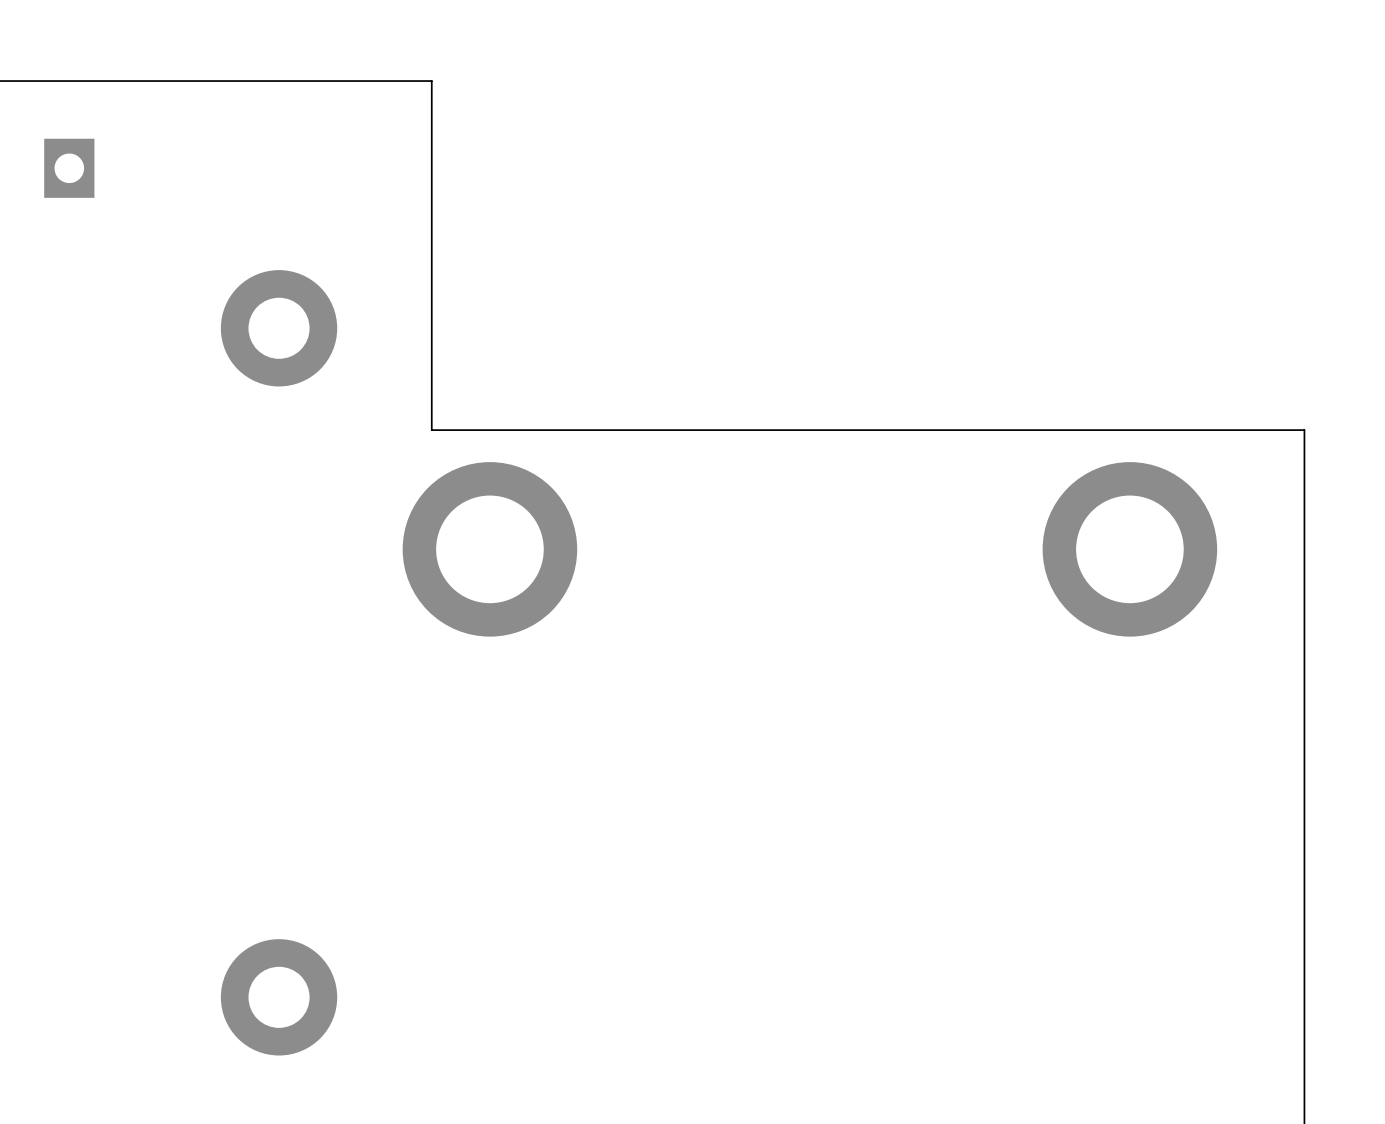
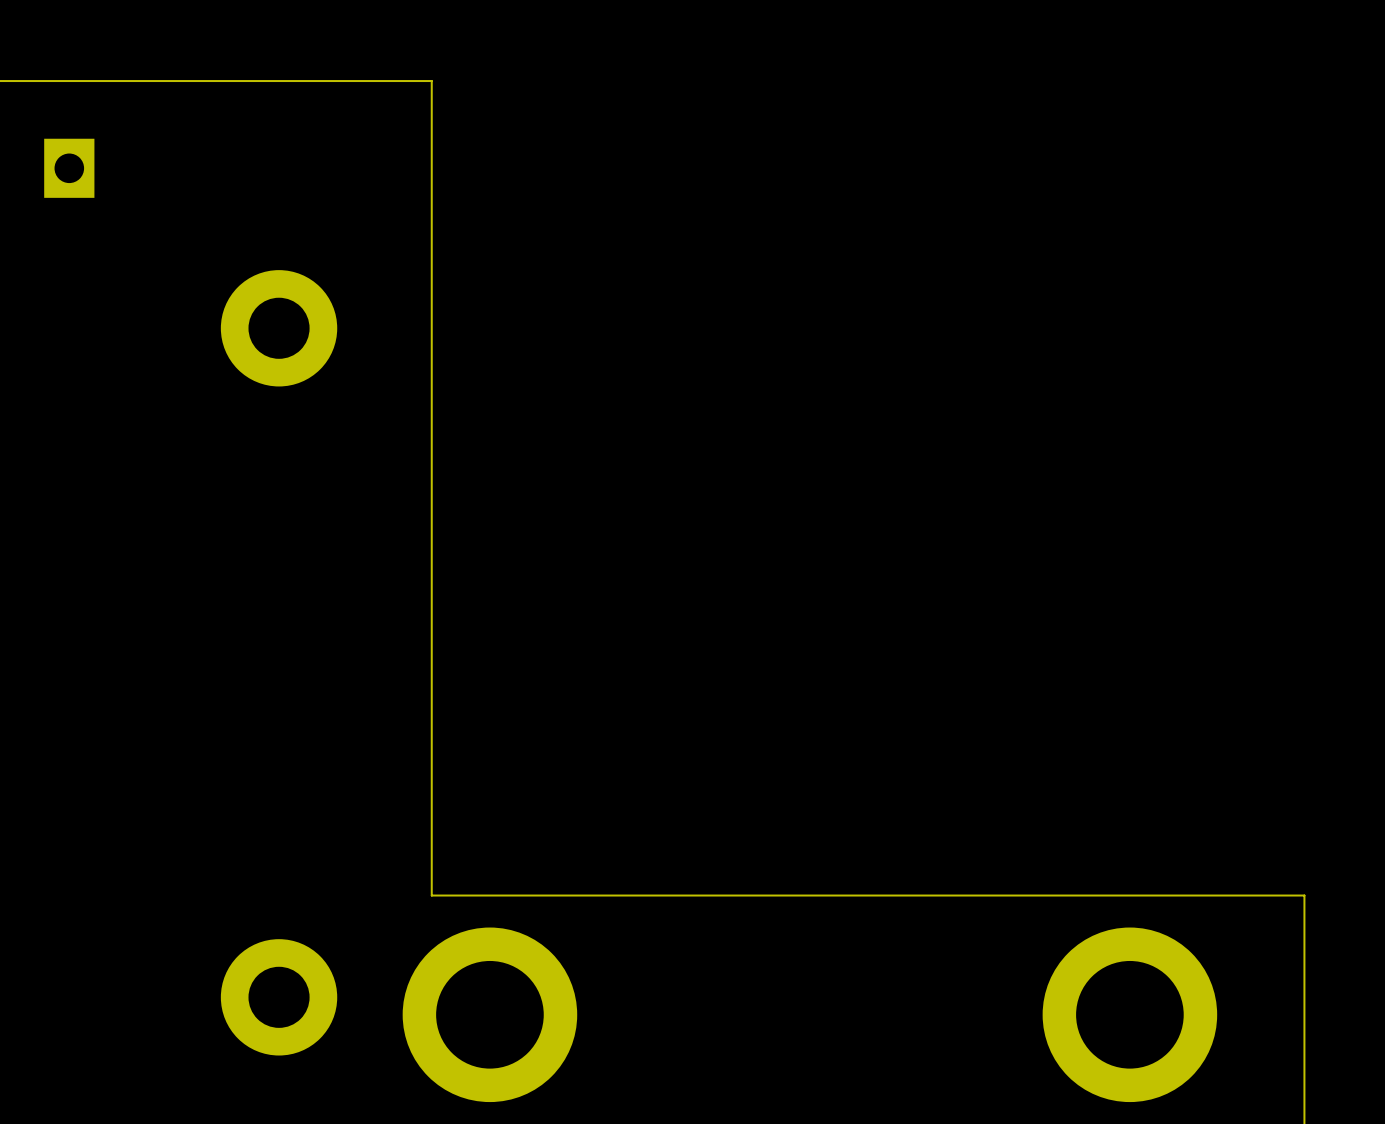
board edge: (431, 430) (1304, 430) (1304, 895) -> (431, 430) (431, 895) (1304, 895)
part: (489, 549) -> none
part: (1129, 549) -> none
part: none -> (489, 1014)
part: none -> (1129, 1014)

